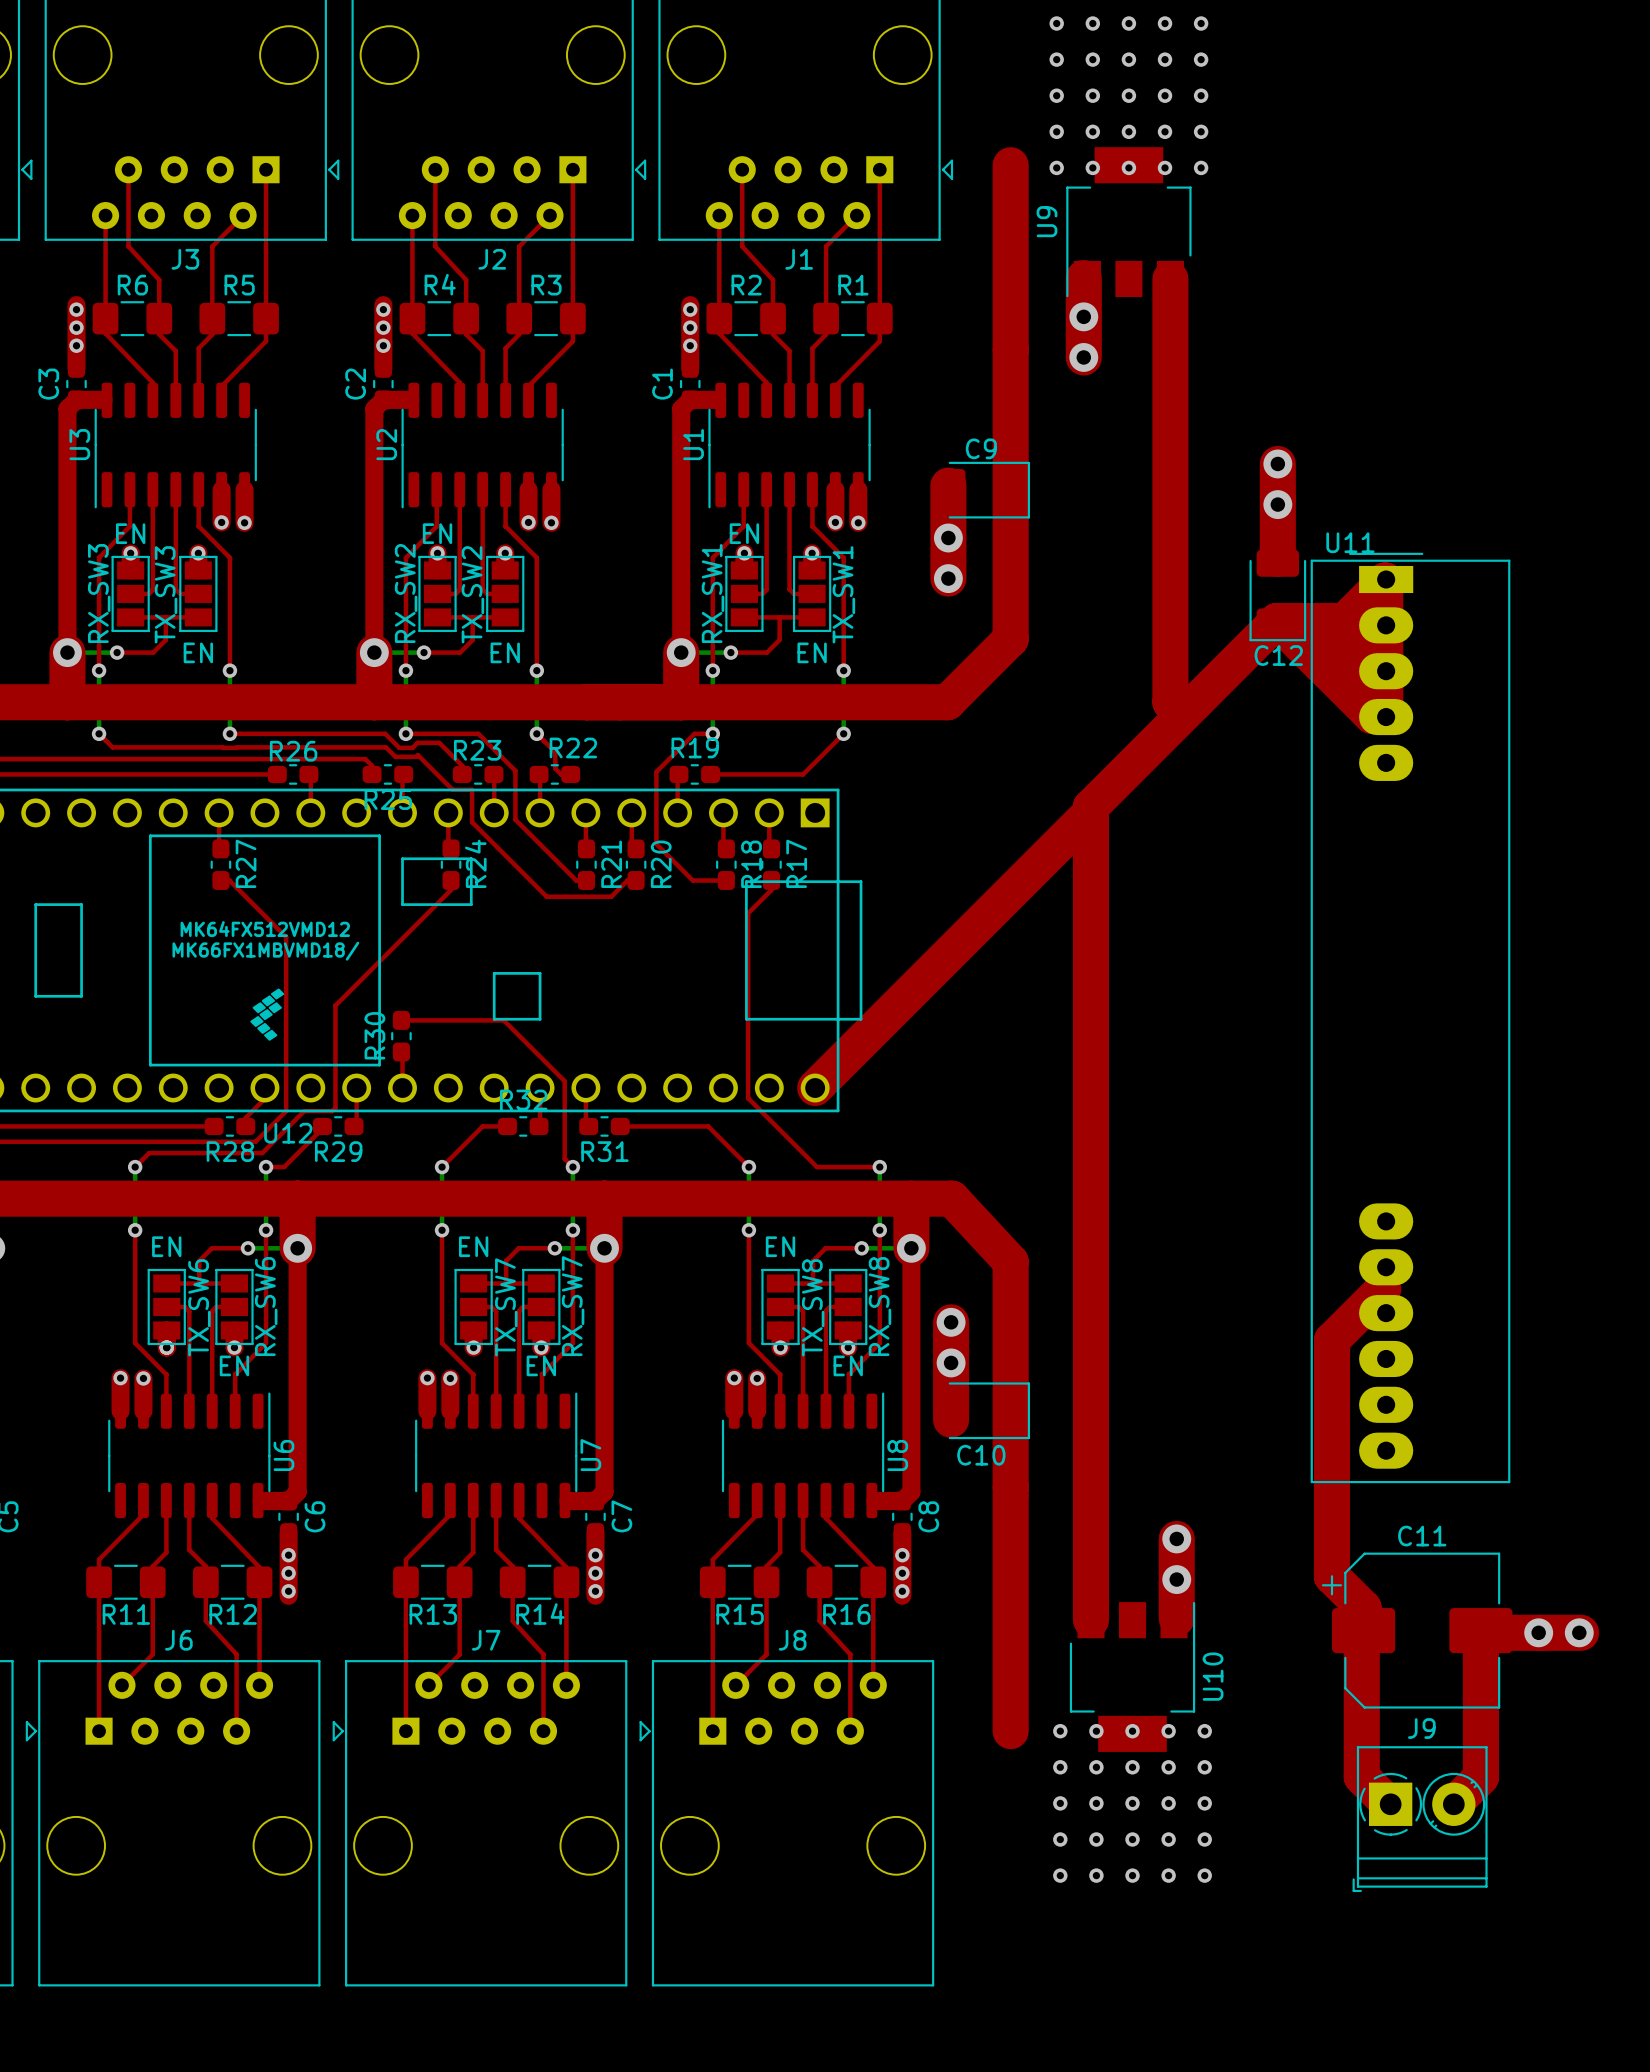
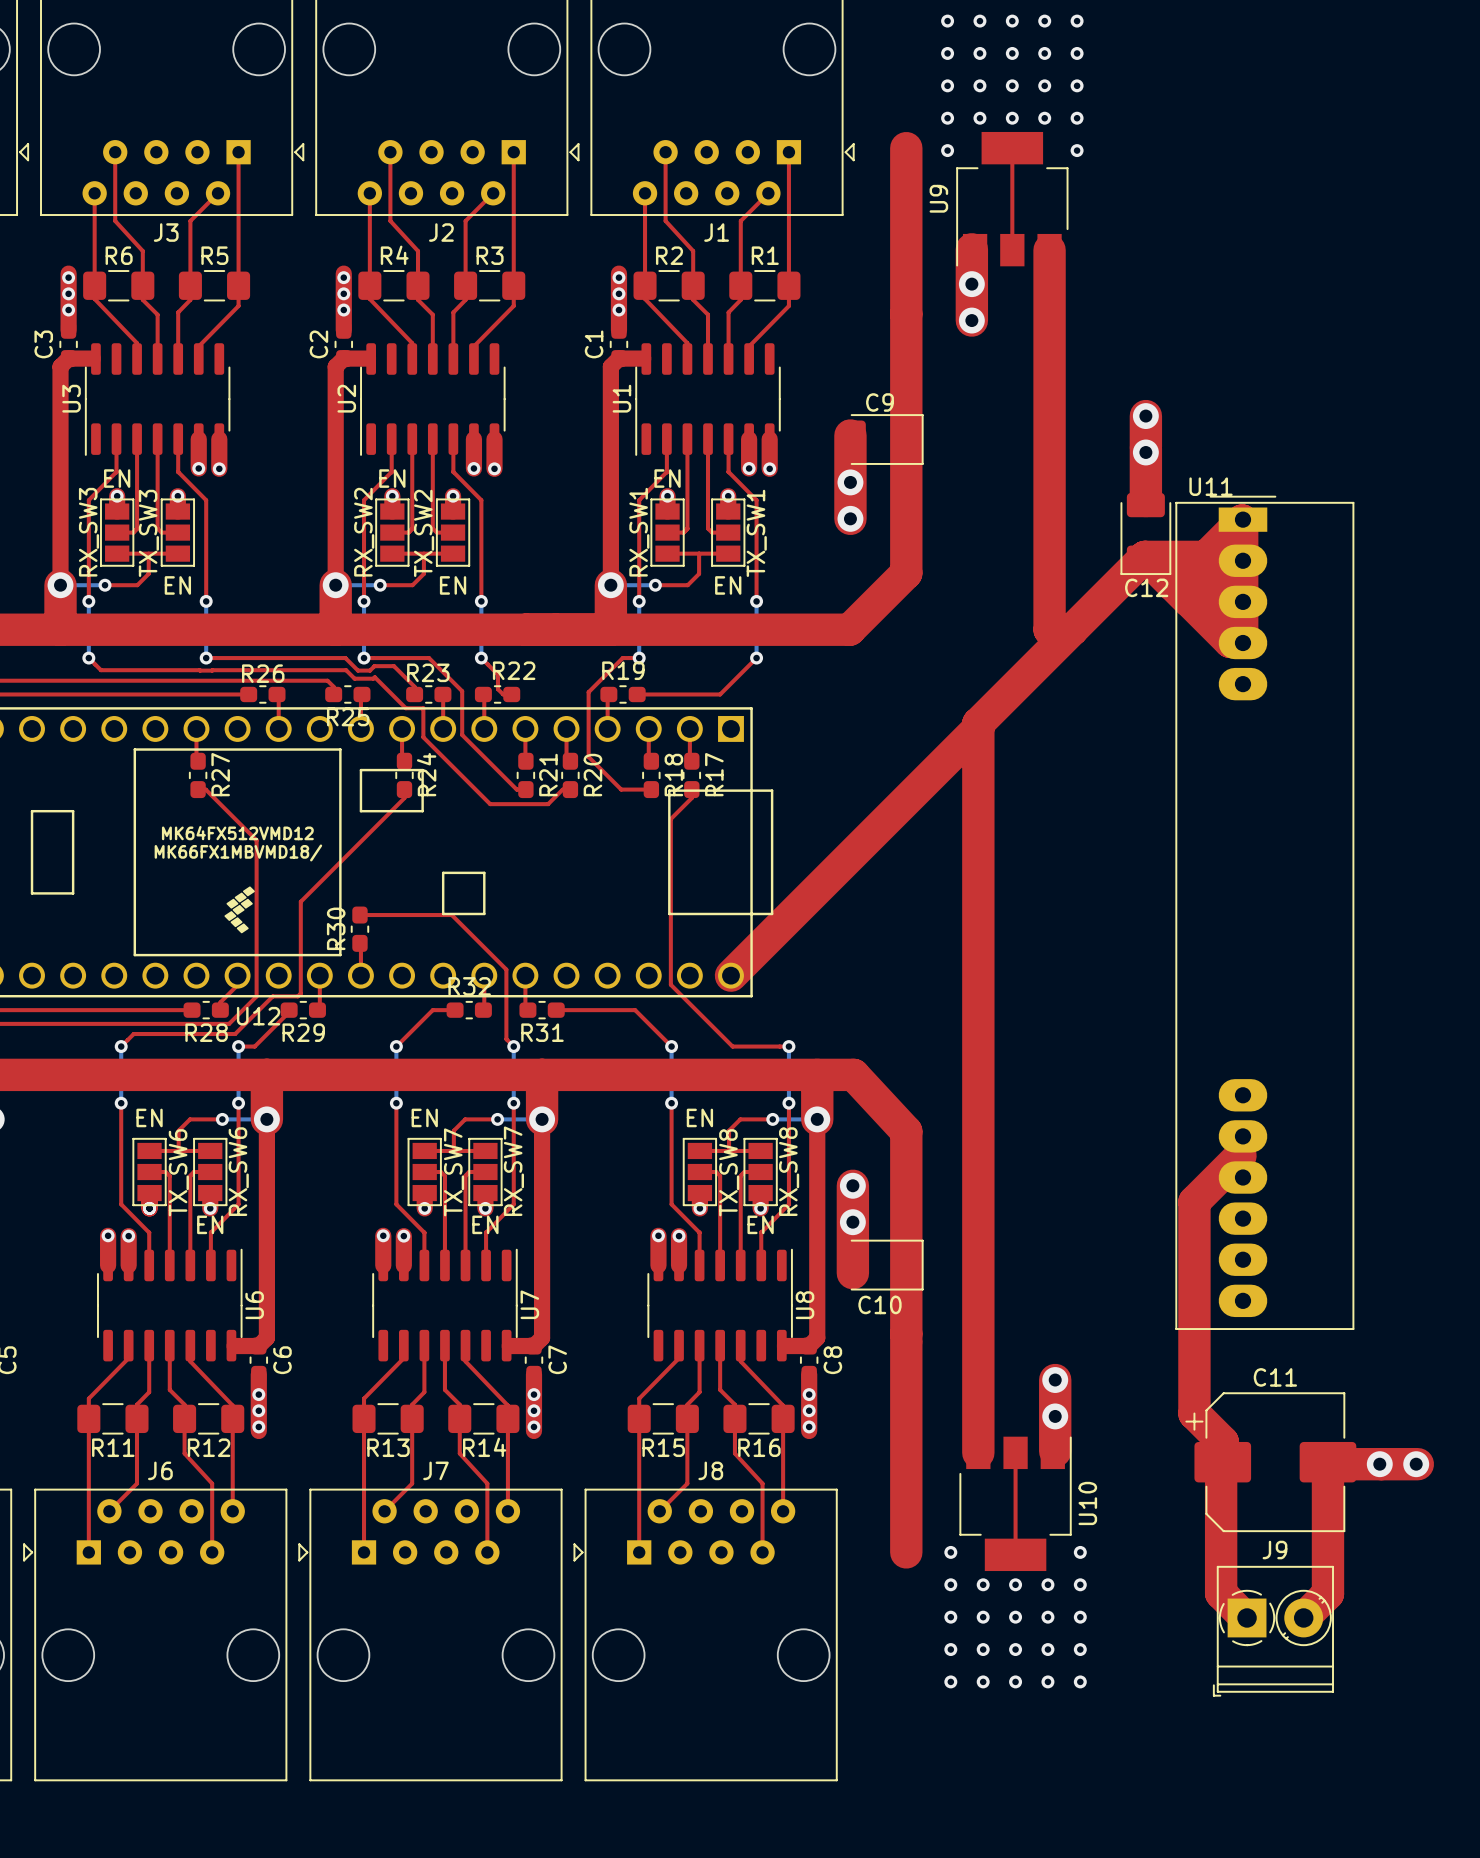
top track: none -> (1012, 148) (1012, 250)
via: (1092, 167) -> none
via: (1128, 167) -> none
via: (1165, 167) -> none
top track: none -> (1015, 1451) (1015, 1554)
via: (1096, 1731) -> none
via: (1132, 1731) -> none
via: (1168, 1731) -> none

